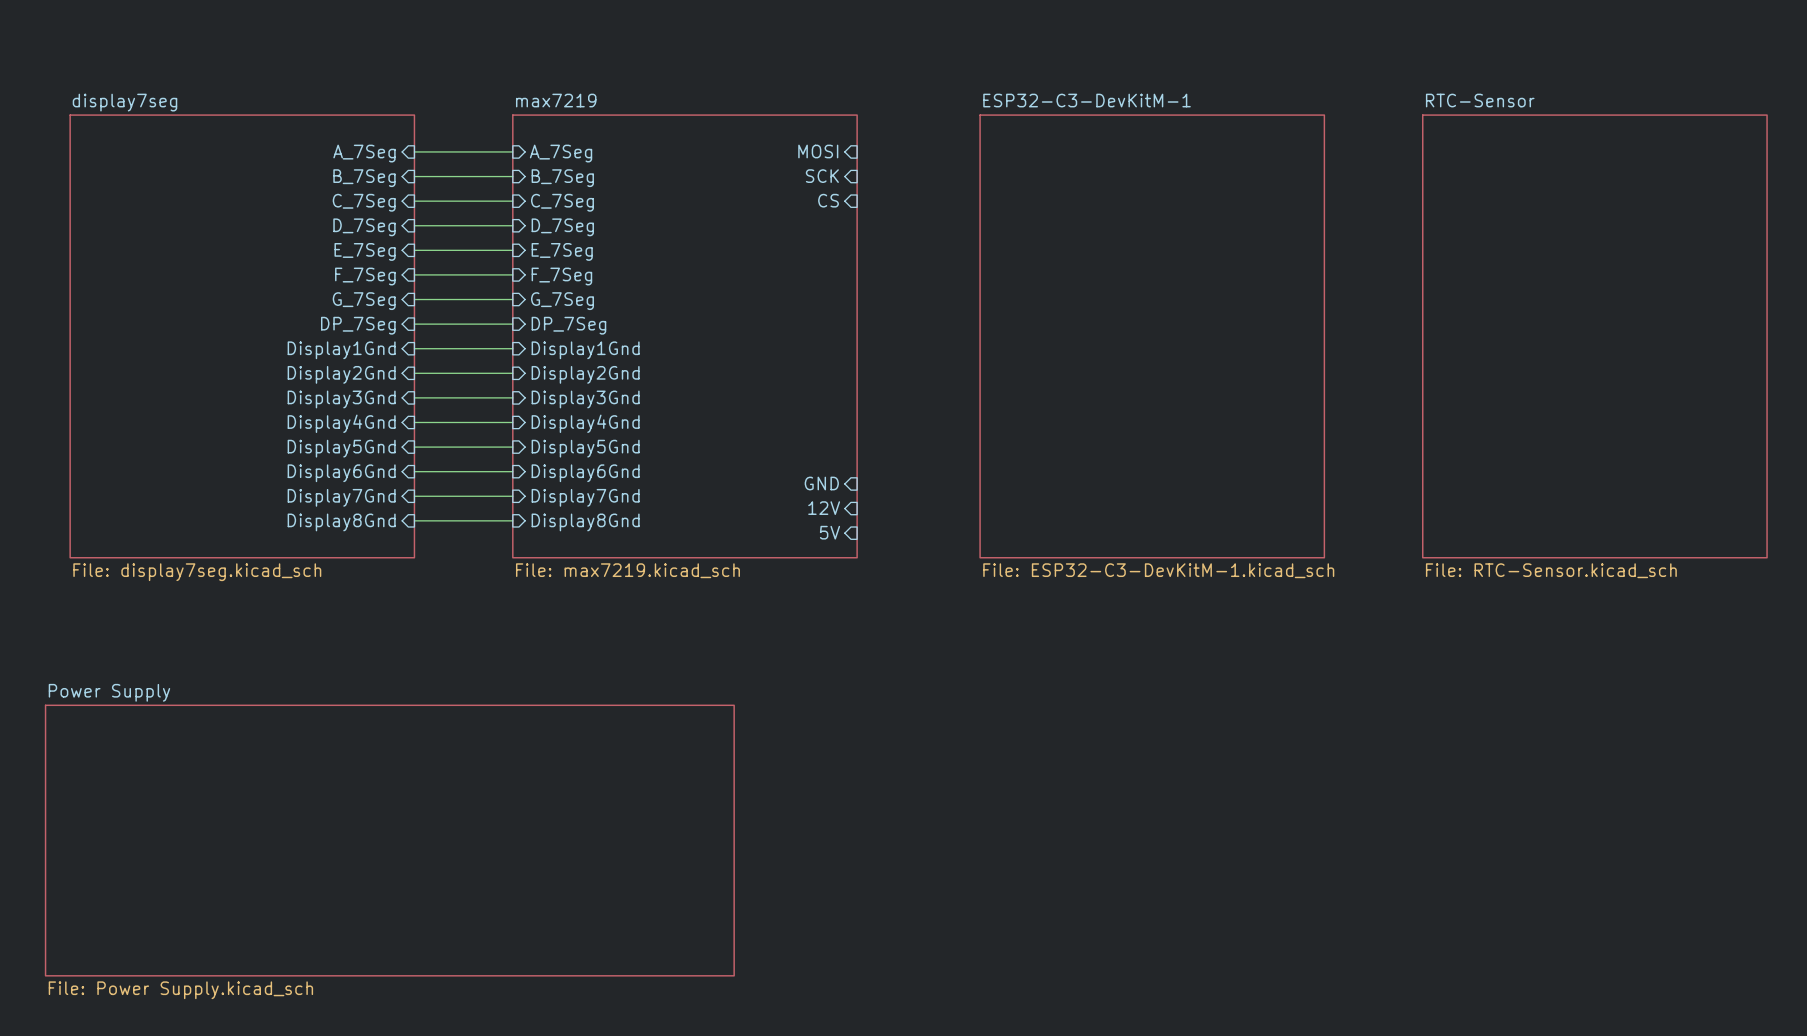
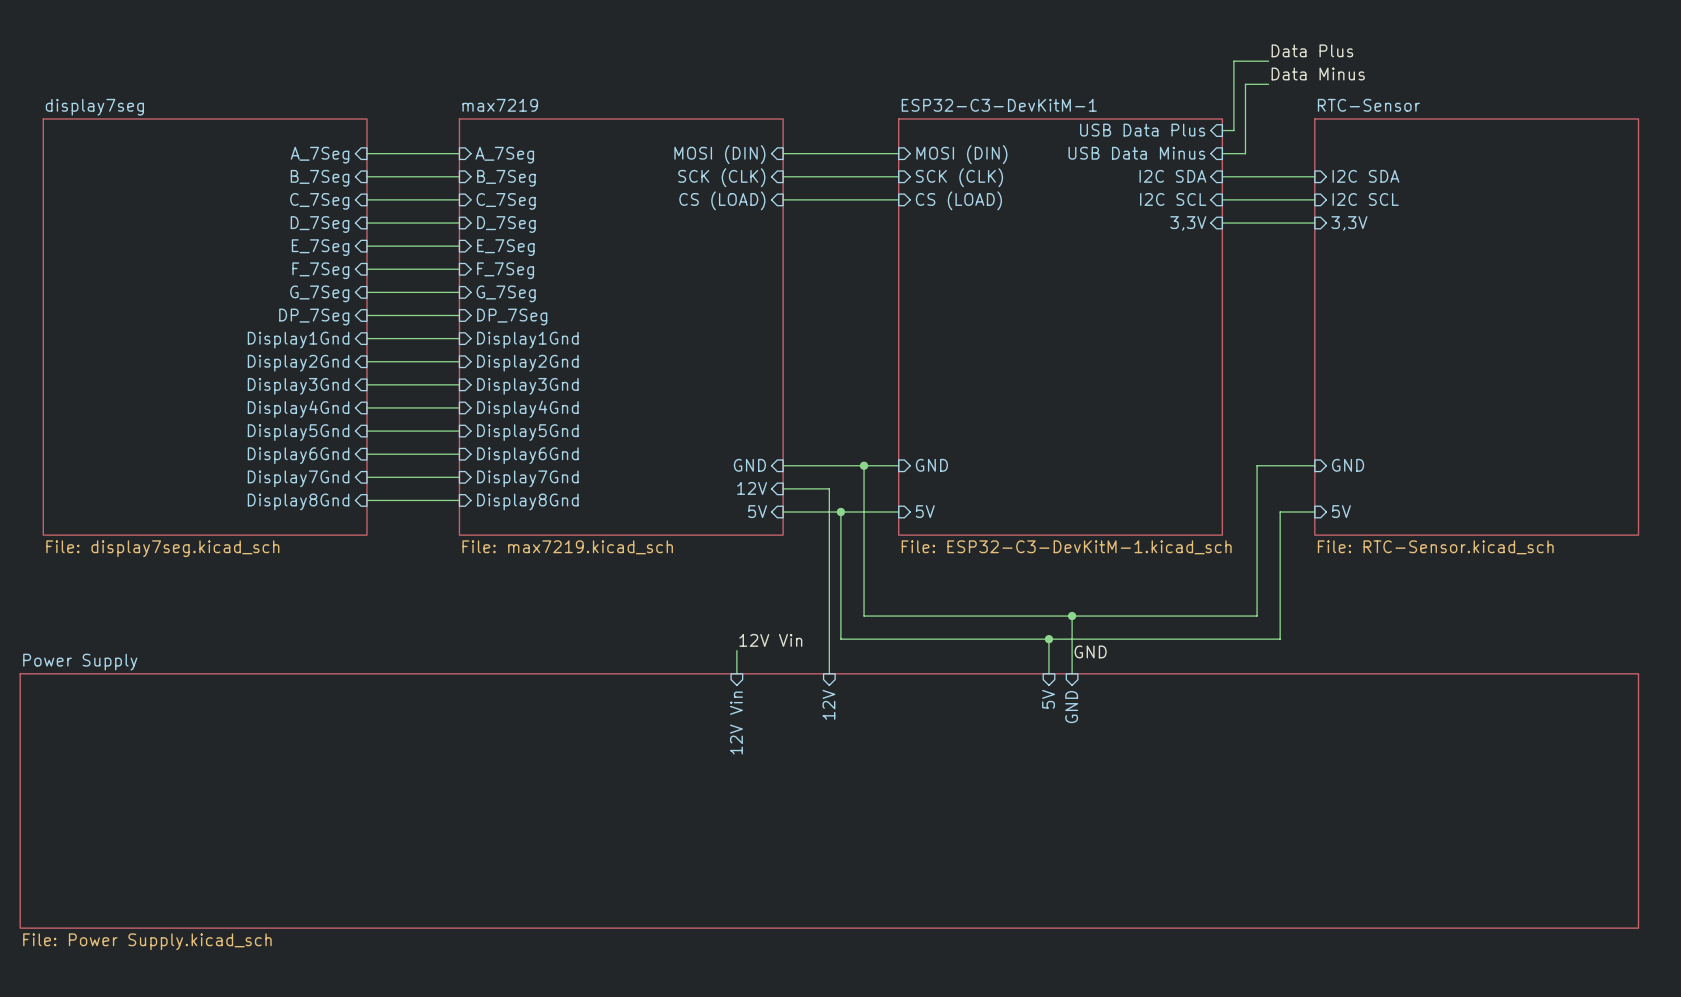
label: none -> Data Plus (1312, 50)
wire: none -> (1268, 61) (1233, 61) (1233, 130) (1222, 130)
label: none -> Data Minus (1318, 73)
wire: none -> (1268, 84) (1245, 84) (1245, 153) (1222, 153)
sheet pin: none -> USB Data Plus (1142, 130)
sheet pin: MOSI (818, 151) -> MOSI (DIN) (719, 154)
wire: none -> (783, 153) (898, 153)
sheet pin: none -> USB Data Minus (1136, 153)
sheet pin: none -> MOSI (DIN) (961, 154)
sheet pin: SCK (822, 176) -> SCK (CLK) (721, 177)
wire: none -> (783, 176) (898, 176)
sheet pin: none -> I2C SDA (1172, 176)
wire: none -> (1222, 176) (1314, 176)
sheet pin: none -> I2C SDA (1365, 176)
sheet pin: none -> SCK (CLK) (959, 177)
sheet pin: CS (828, 200) -> CS (LOAD) (722, 200)
sheet pin: none -> I2C SCL (1173, 199)
sheet pin: none -> I2C SCL (1365, 199)
wire: none -> (783, 199) (898, 199)
wire: none -> (1222, 199) (1314, 199)
sheet pin: none -> CS (LOAD) (958, 200)
wire: none -> (1222, 223) (1314, 223)
sheet pin: none -> 3,3V (1188, 223)
sheet pin: none -> 3,3V (1349, 223)
wire: none -> (783, 465) (898, 465)
wire: none -> (864, 465) (864, 616) (1257, 616) (1257, 465) (1314, 465)
junction: none -> (864, 465)
sheet pin: none -> GND (931, 465)
sheet pin: none -> GND (1348, 465)
wire: none -> (783, 488) (829, 488) (829, 673)
sheet pin: none -> 5V (925, 511)
sheet pin: none -> 5V (1341, 511)
wire: none -> (783, 512) (898, 512)
wire: none -> (840, 512) (840, 639) (1280, 639) (1280, 512) (1314, 512)
junction: none -> (840, 512)
wire: none -> (1072, 616) (1072, 673)
junction: none -> (1072, 616)
wire: none -> (1048, 639) (1048, 673)
junction: none -> (1048, 639)
label: none -> 12V Vin (770, 640)
wire: none -> (736, 650) (736, 673)
label: none -> GND (1090, 651)
sheet pin: none -> 5V (1048, 699)
sheet pin: none -> 12V (828, 704)
sheet pin: none -> GND (1071, 707)
sheet pin: none -> 12V Vin (736, 723)
sheet Power Supply: File: Power Supply.kicad_sch (389, 840) -> none
sheet Power Supply: none -> File: Power Supply.kicad_sch (829, 800)

